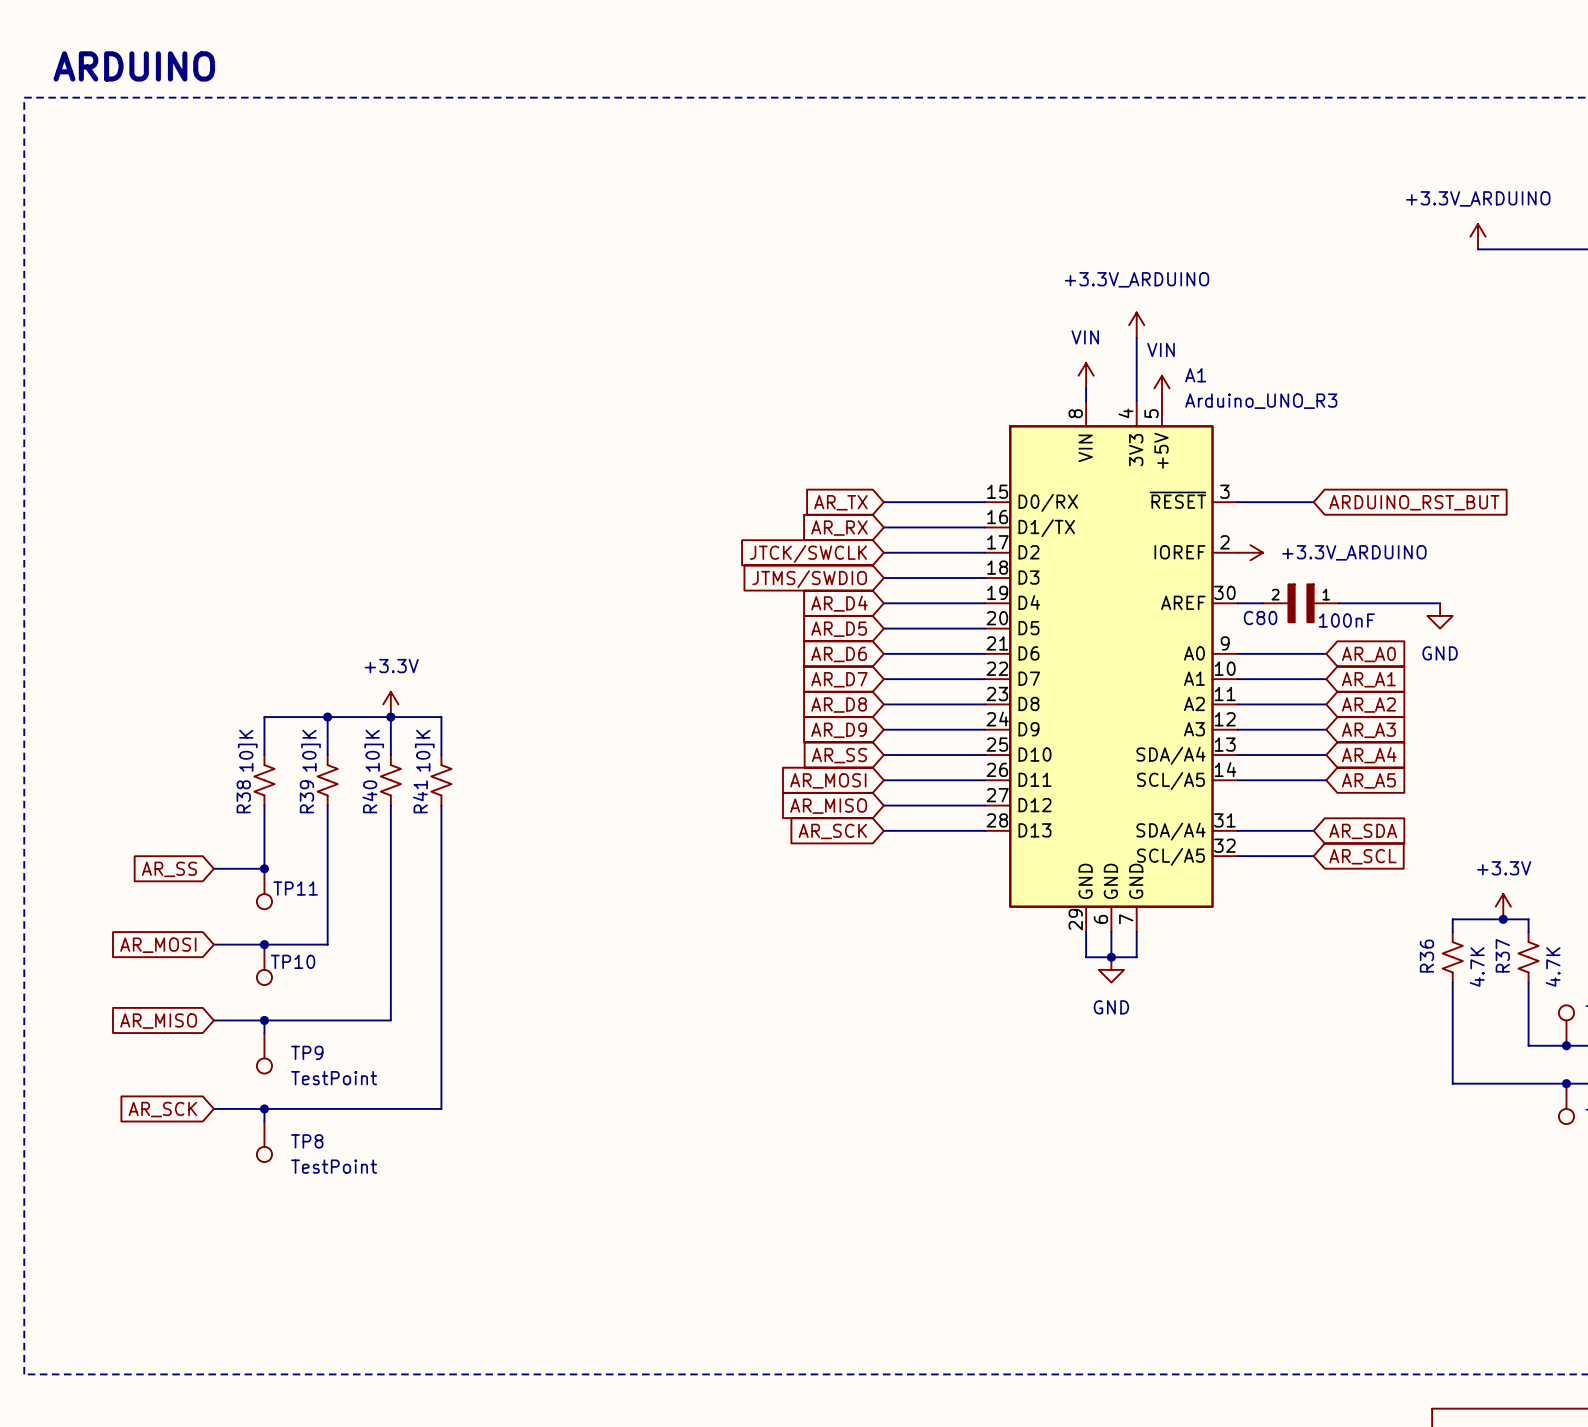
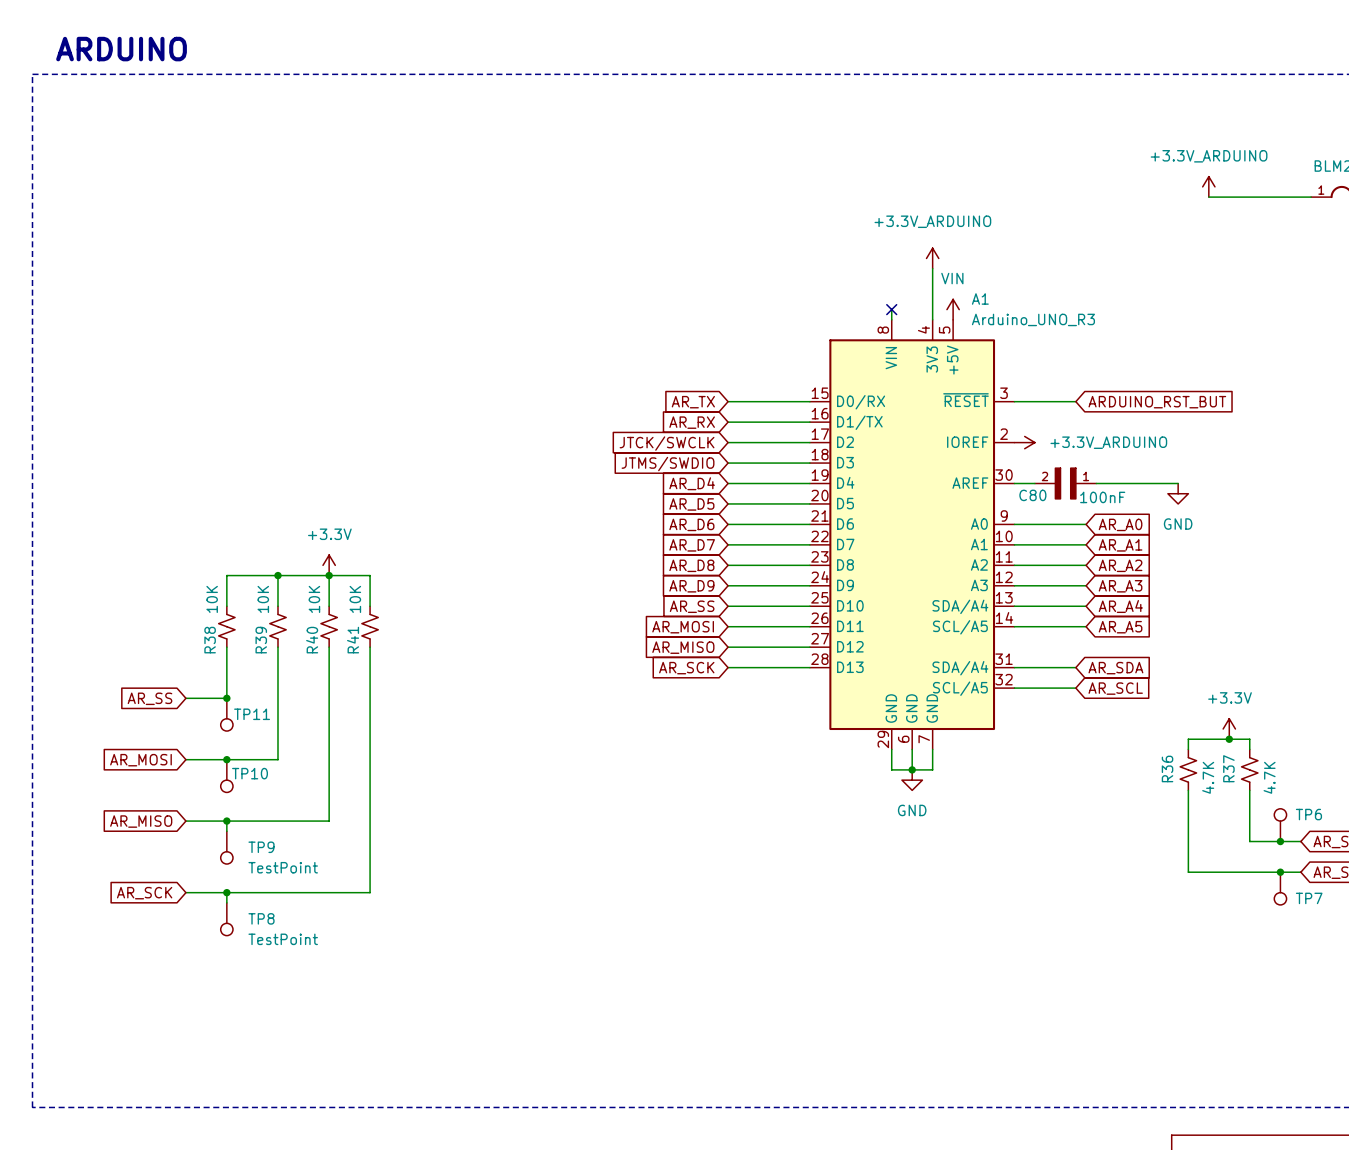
power symbol: VIN (1086, 375) -> none
no-connect mark: none -> (891, 309)
R38 value: 10]K (247, 750) -> 10K (212, 599)
R39 value: 10]K (310, 750) -> 10K (263, 599)
R40 value: 10]K (374, 750) -> 10K (314, 599)
R41 value: 10]K (424, 750) -> 10K (355, 599)

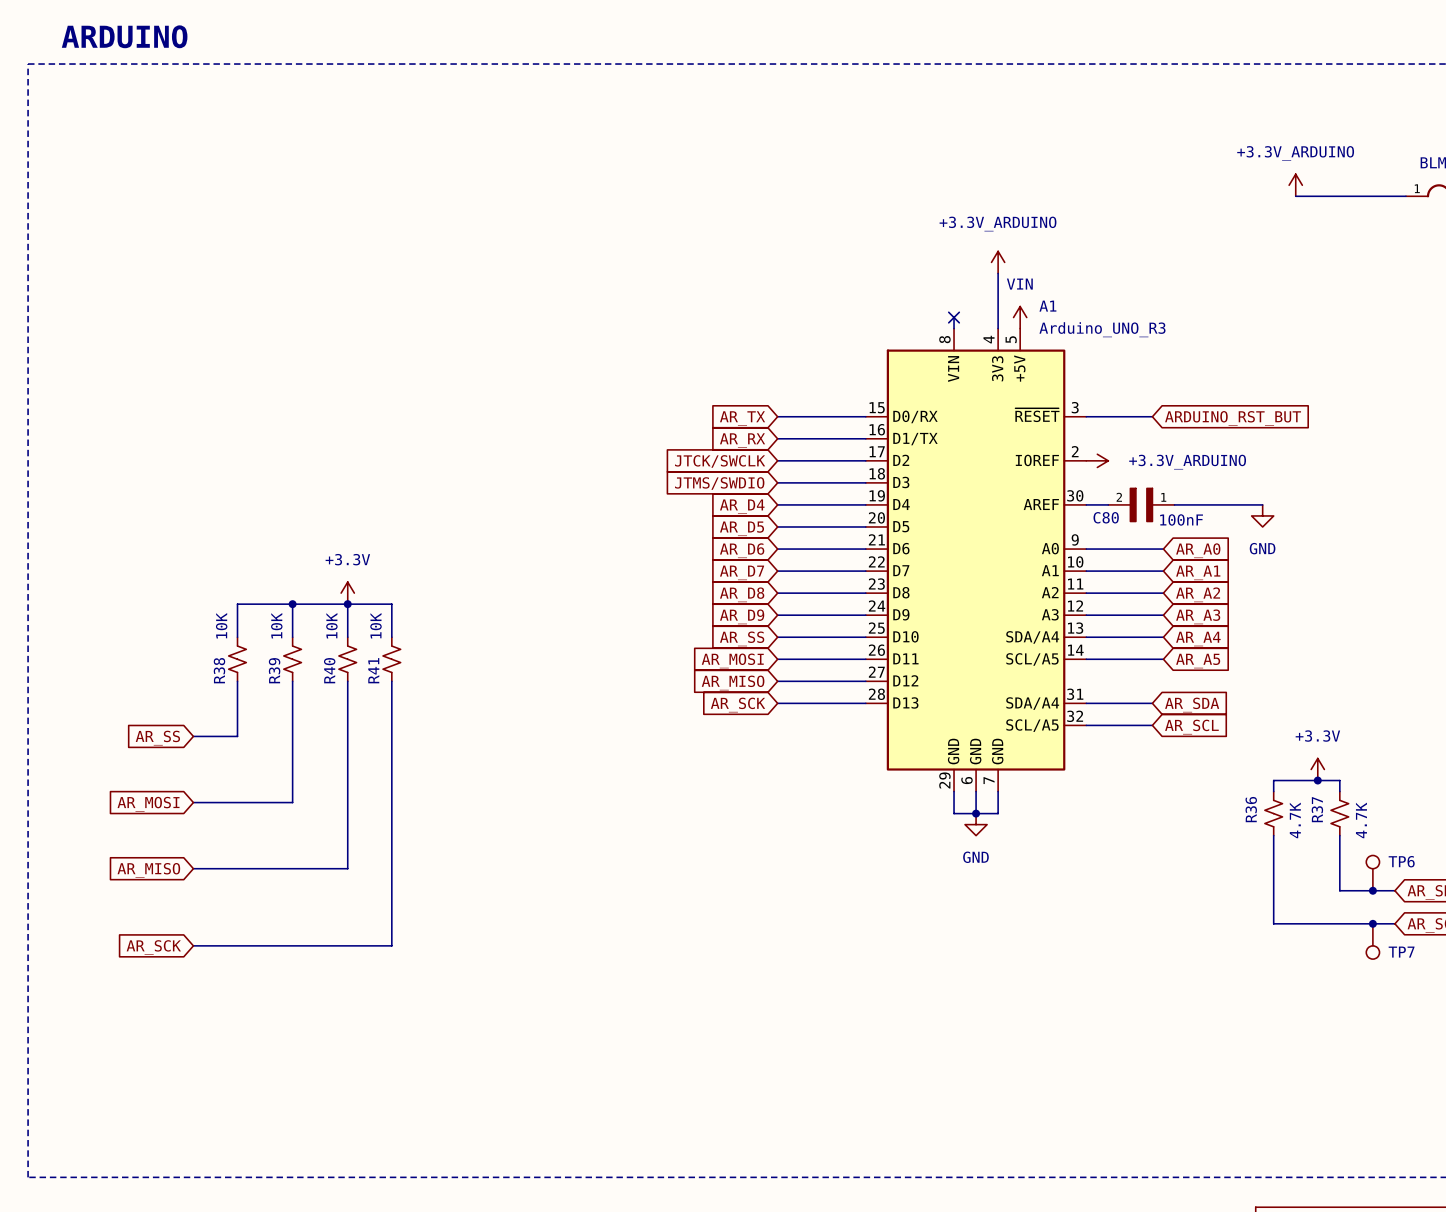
junction: (226, 698) -> none
TP11: (226, 714) -> none
junction: (226, 759) -> none
TP10: (226, 776) -> none
wire: (226, 821) (226, 831) -> none
junction: (226, 821) -> none
TP9: TestPoint (226, 847) -> none
wire: (226, 892) (226, 902) -> none
junction: (226, 892) -> none
TP8: TestPoint (226, 919) -> none

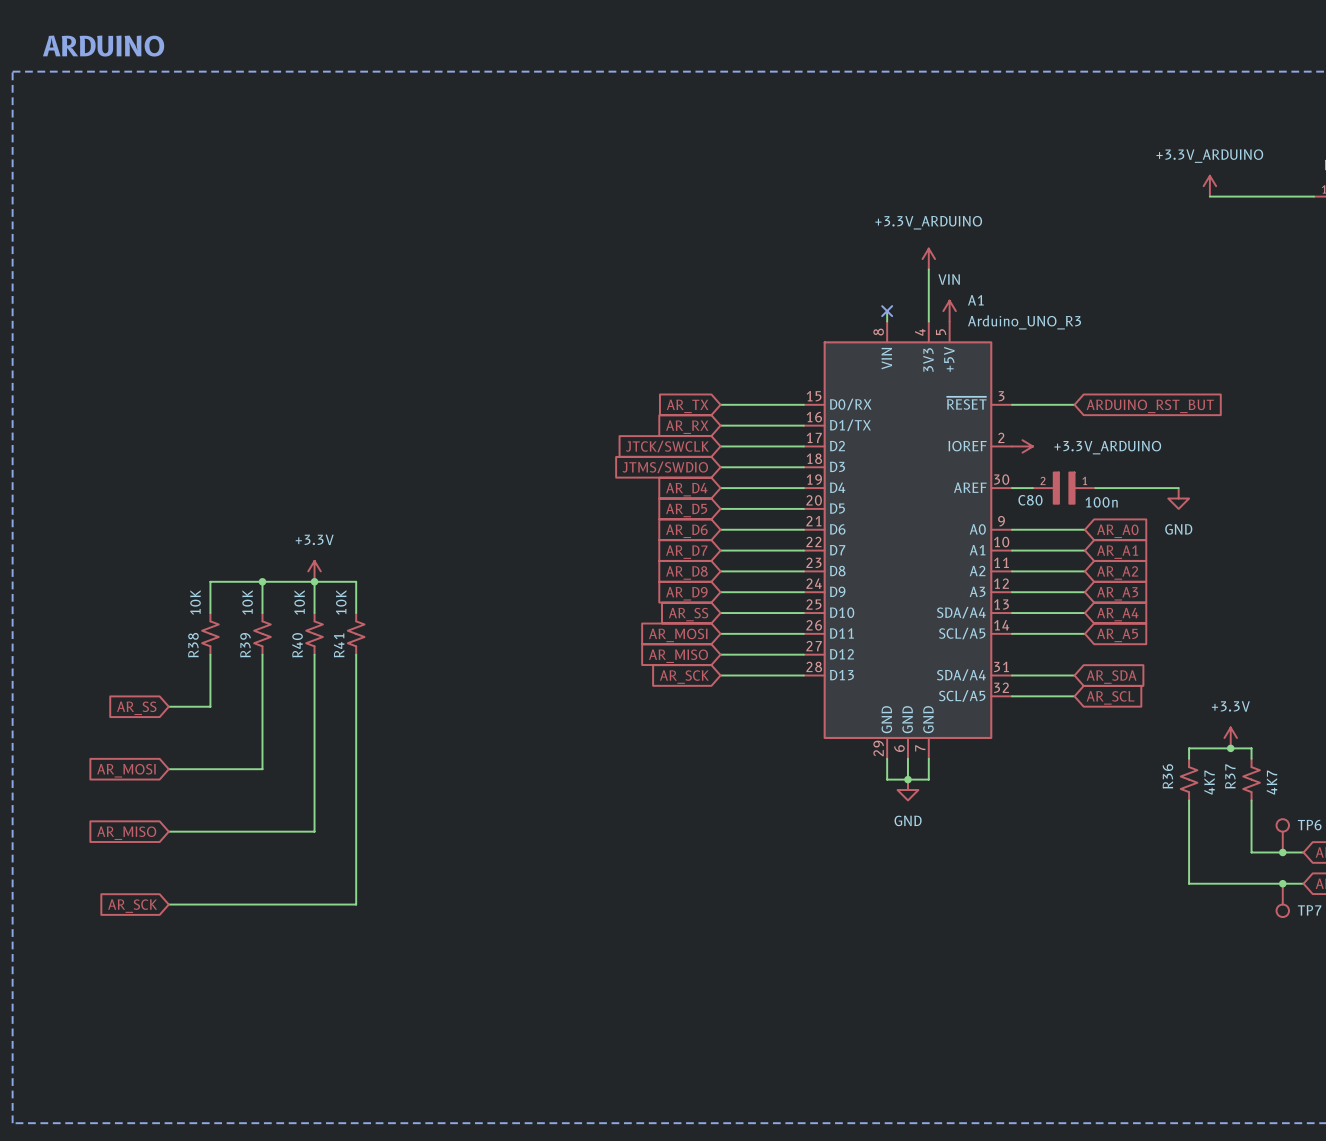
C80 value: 100nF (1181, 519) -> 100n (1101, 502)
R36 value: 4.7K (1295, 820) -> 4K7 (1209, 782)
R37 value: 4.7K (1361, 820) -> 4K7 (1271, 782)

